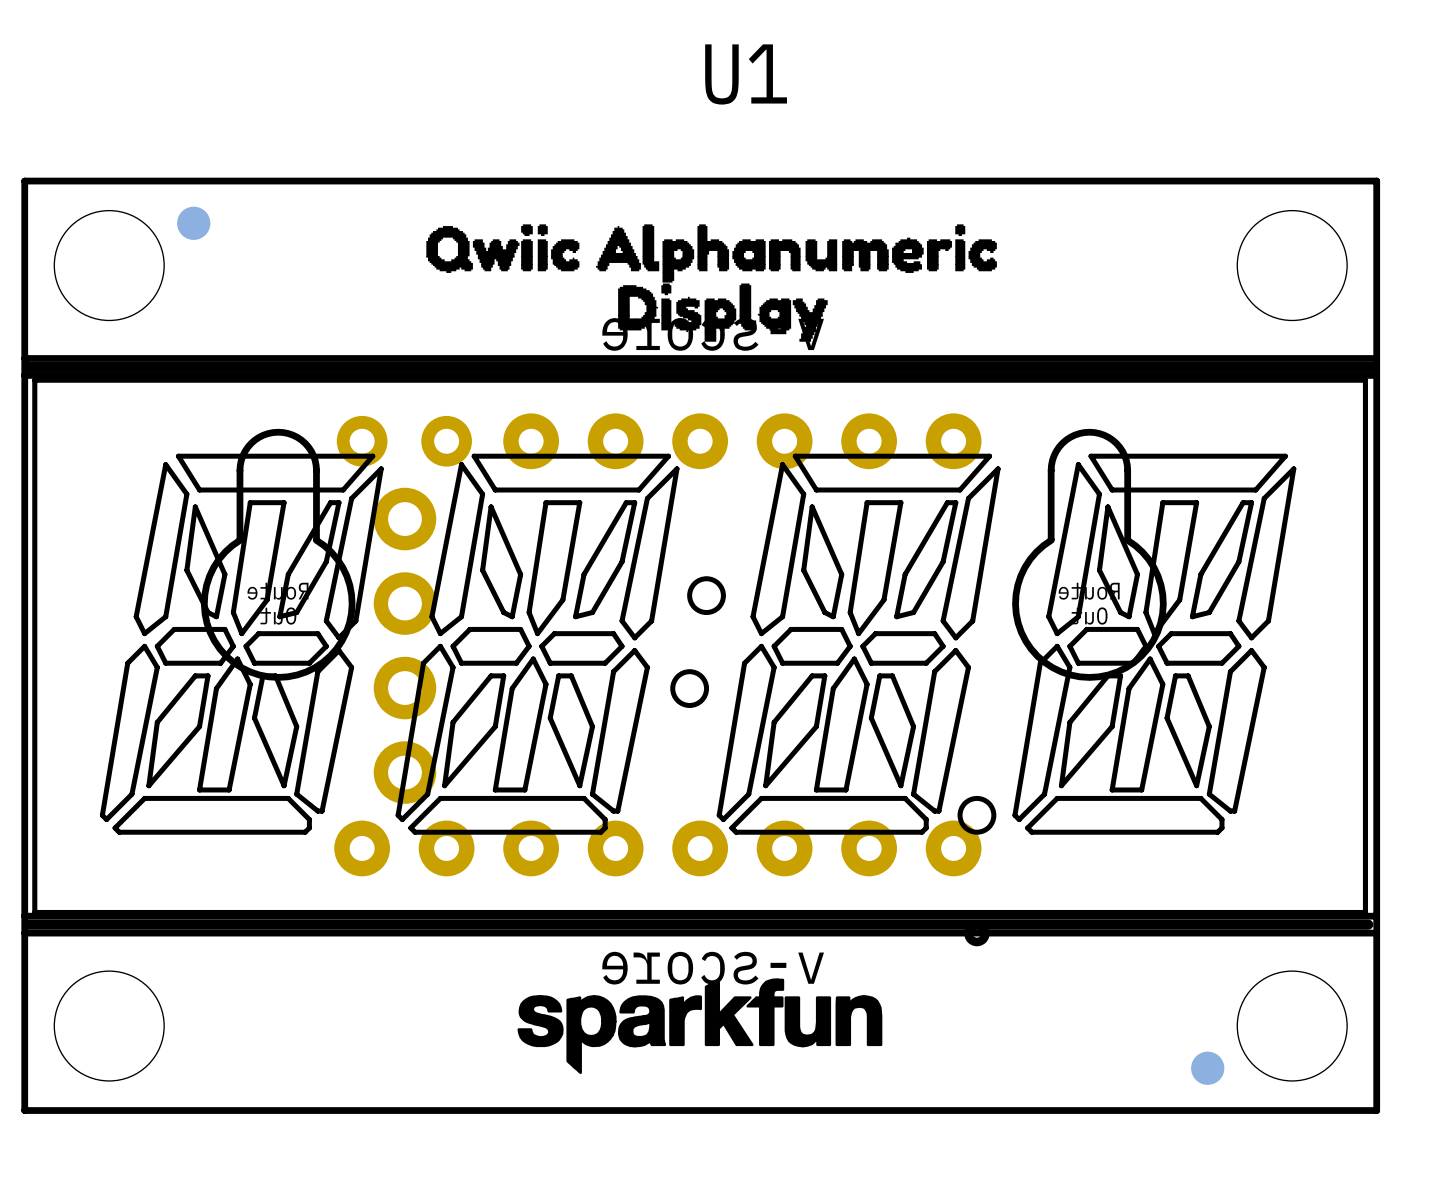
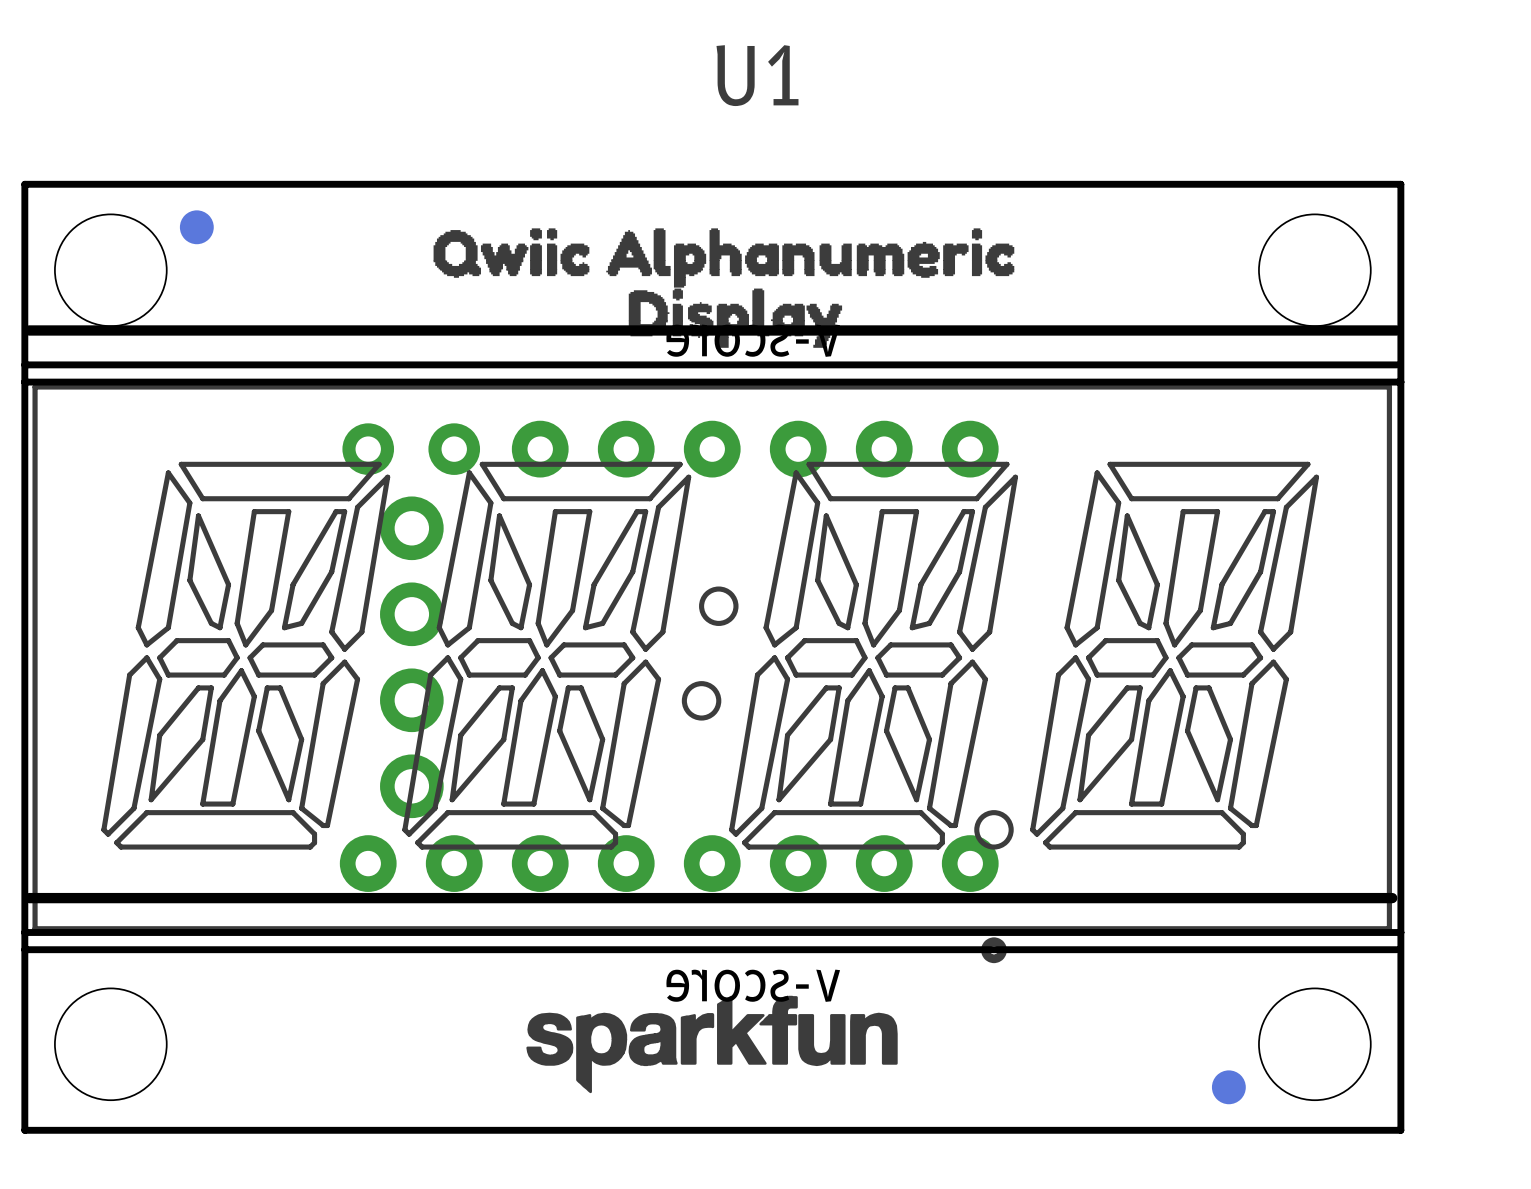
board edge: (1372, 366) (28, 366) -> (1396, 330) (29, 330)
drawing: [200, 428, 356, 681] -> none
drawing: [1012, 428, 1167, 681] -> none
board edge: (1368, 924) (28, 924) -> (1392, 898) (29, 898)

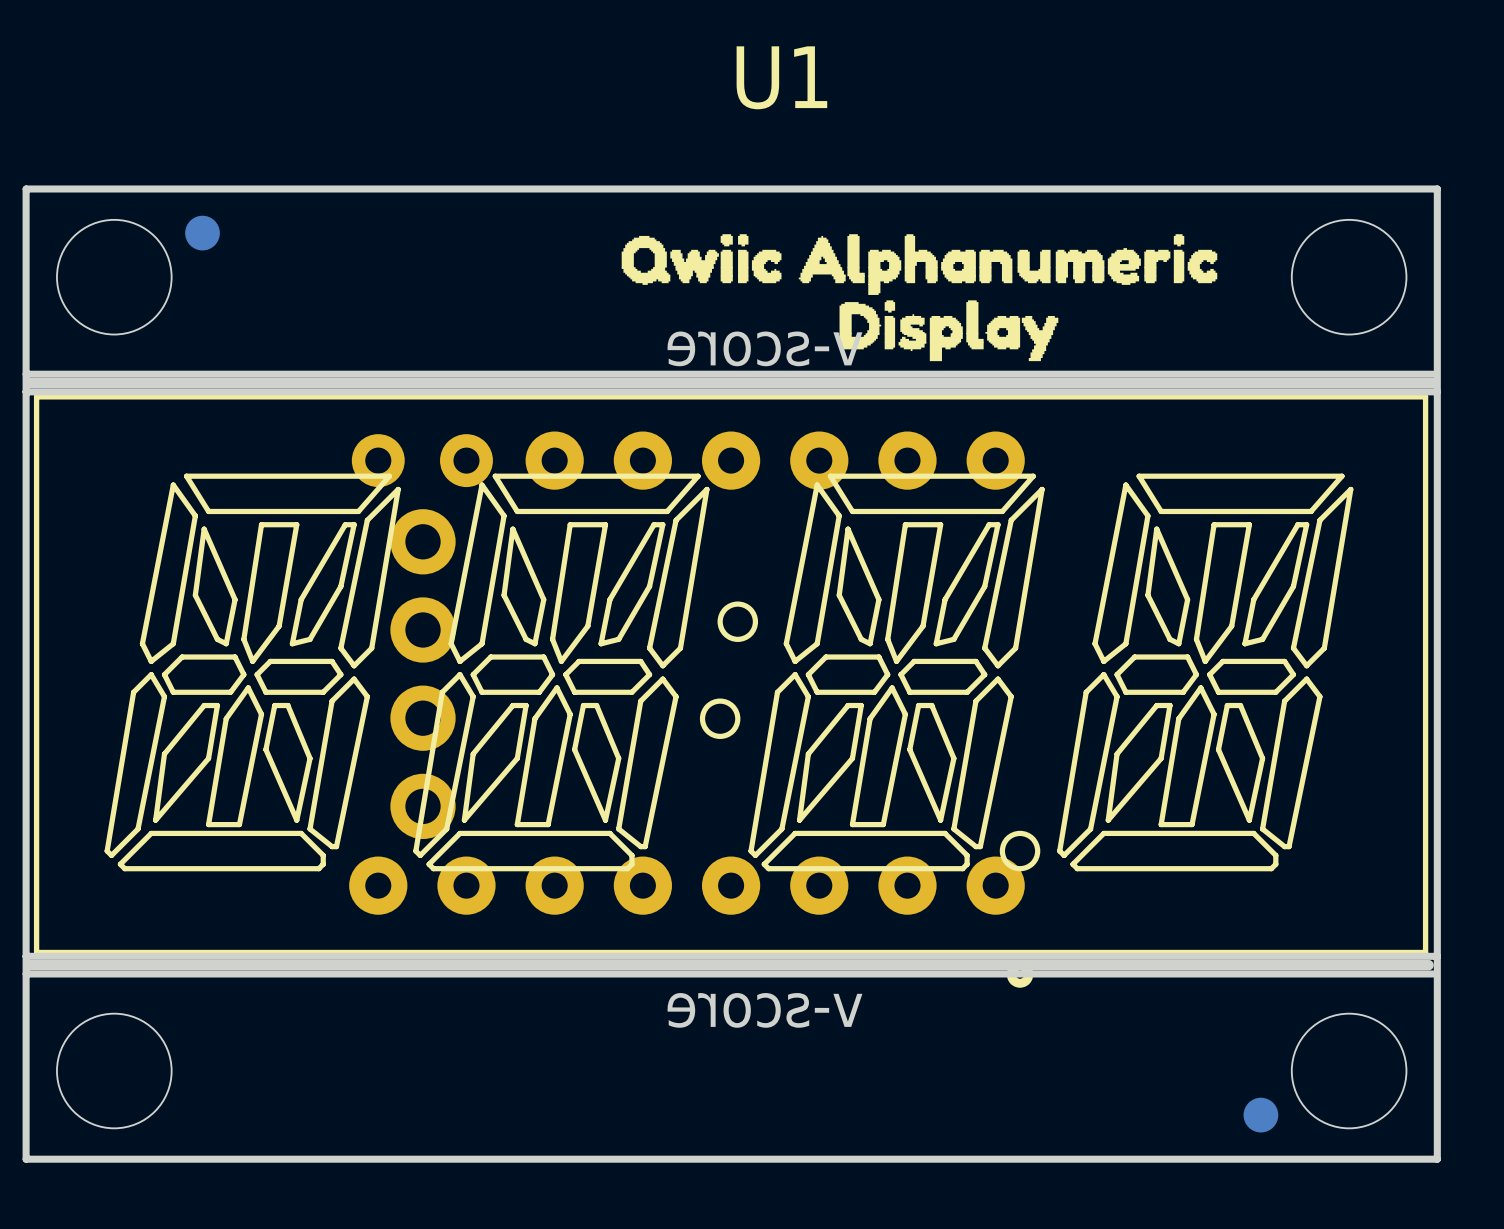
drawing position: (723, 257) -> (919, 264)
drawing position: (735, 318) -> (948, 330)
board edge: (1396, 330) (29, 330) -> (1432, 383) (30, 383)
board edge: (1392, 898) (29, 898) -> (1428, 965) (30, 965)
drawing: [526, 995, 898, 1094] -> none

